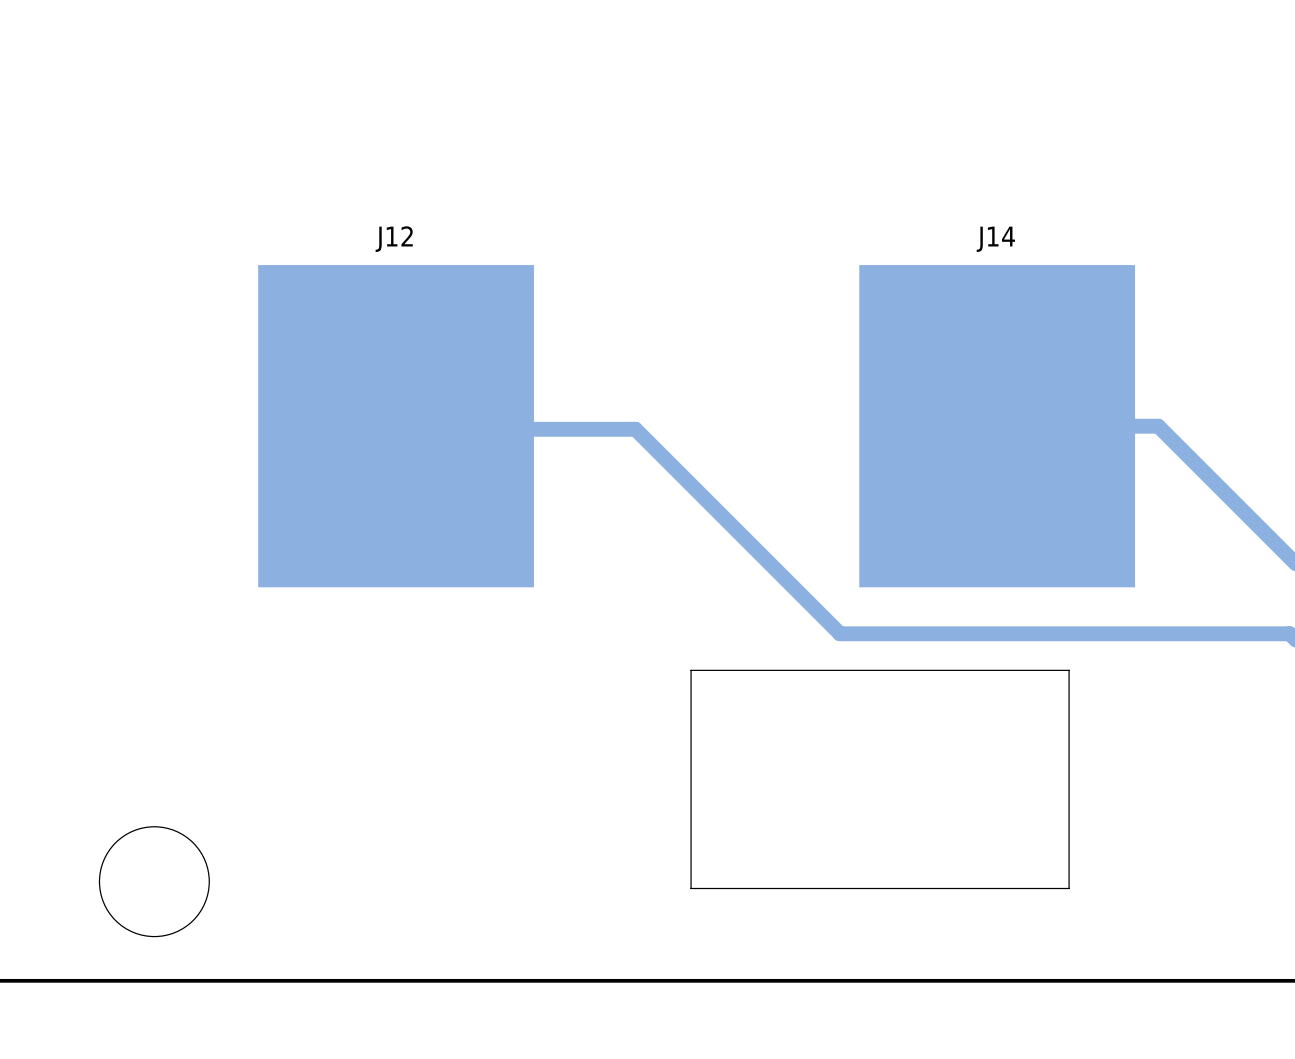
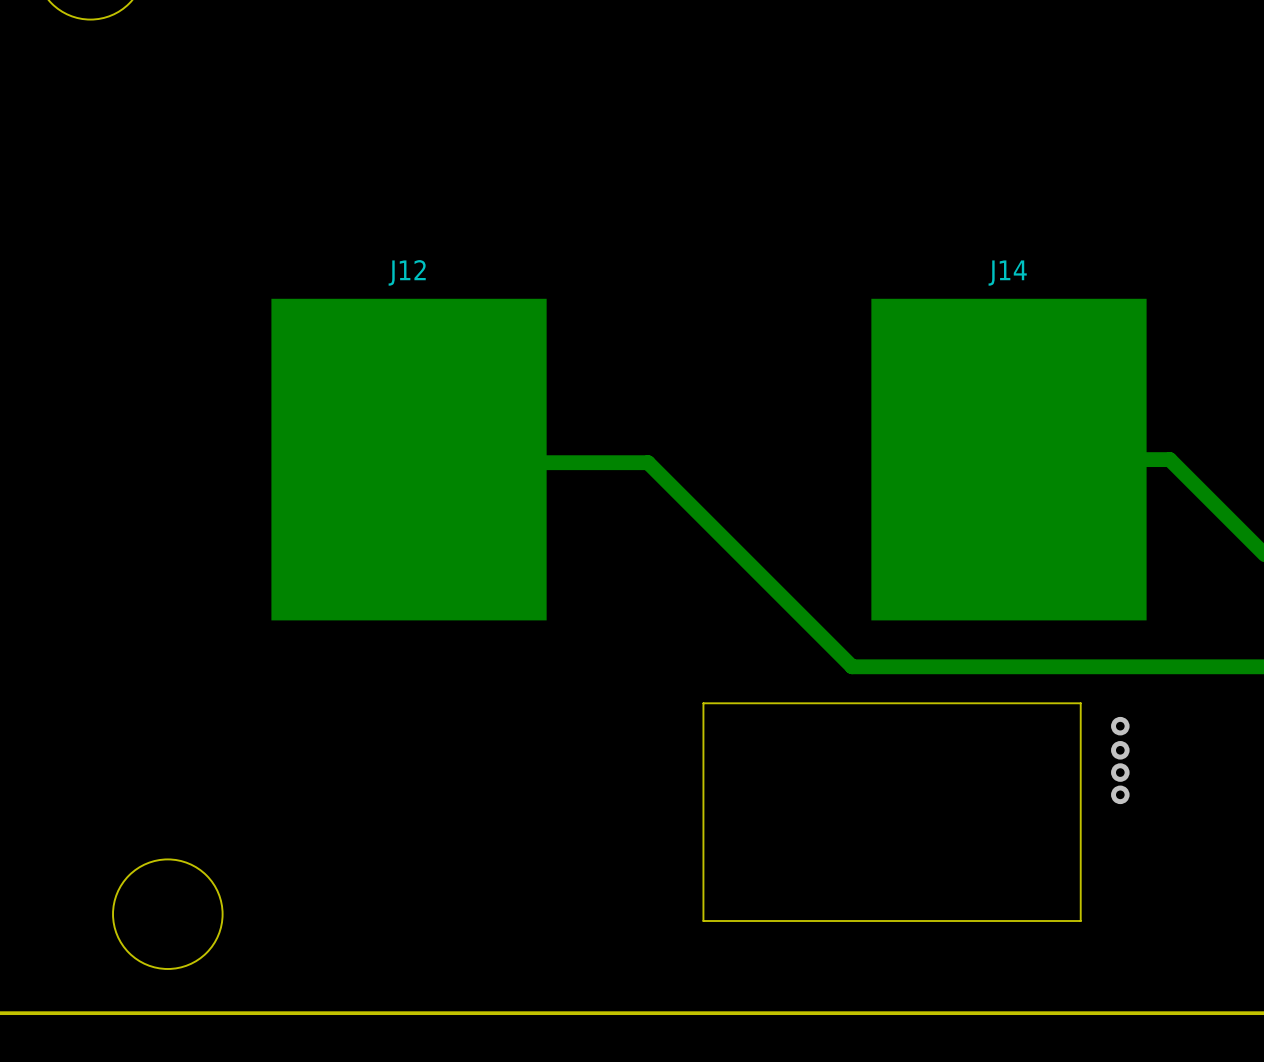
via: none -> (1120, 726)
via: none -> (1120, 750)
via: none -> (1120, 772)
via: none -> (1120, 794)

